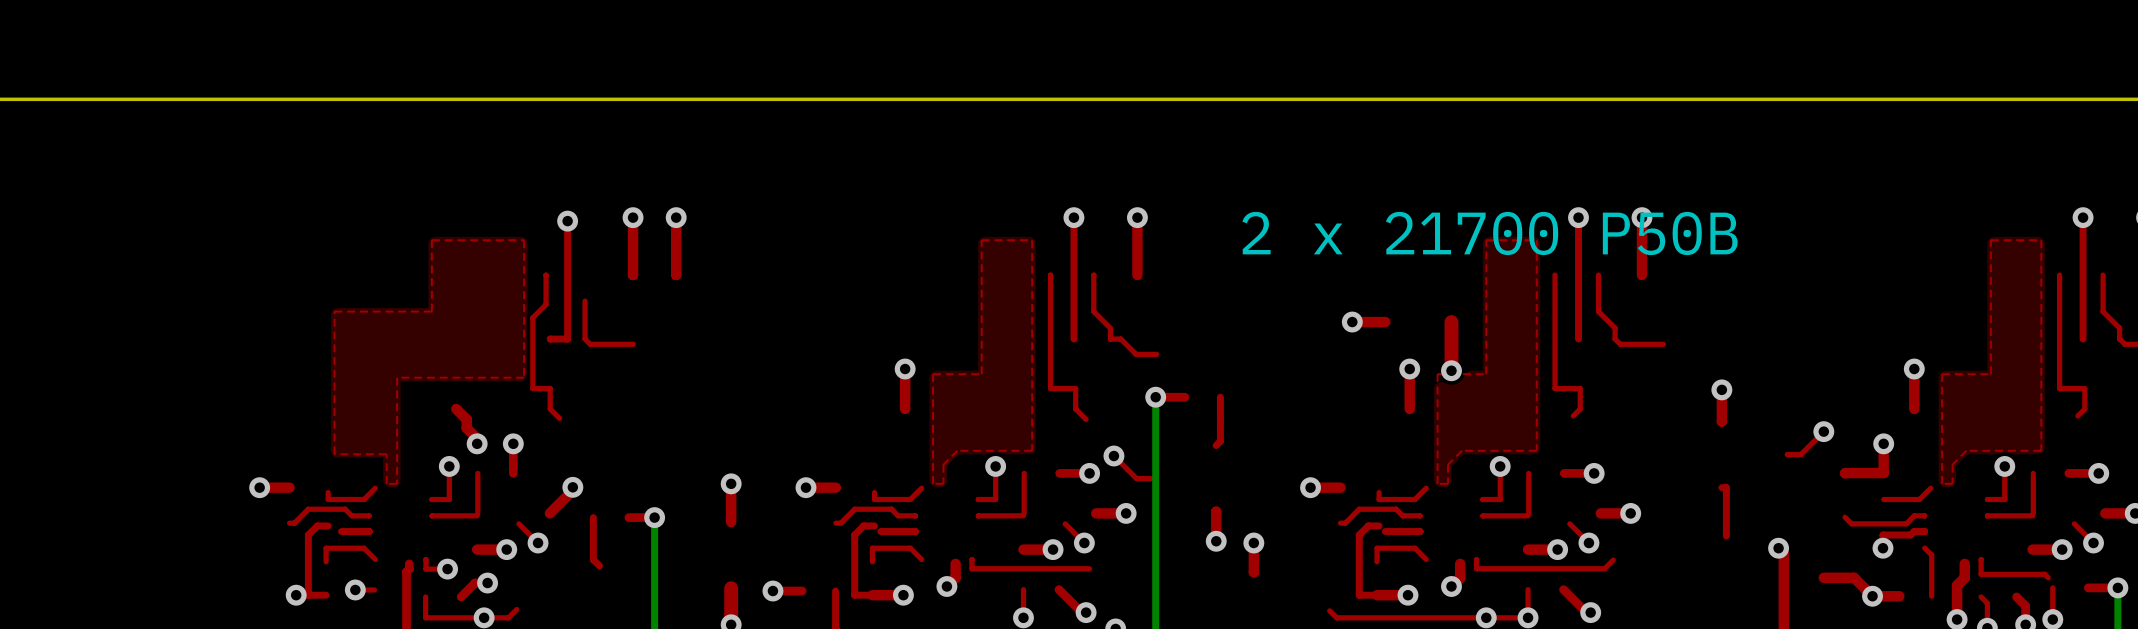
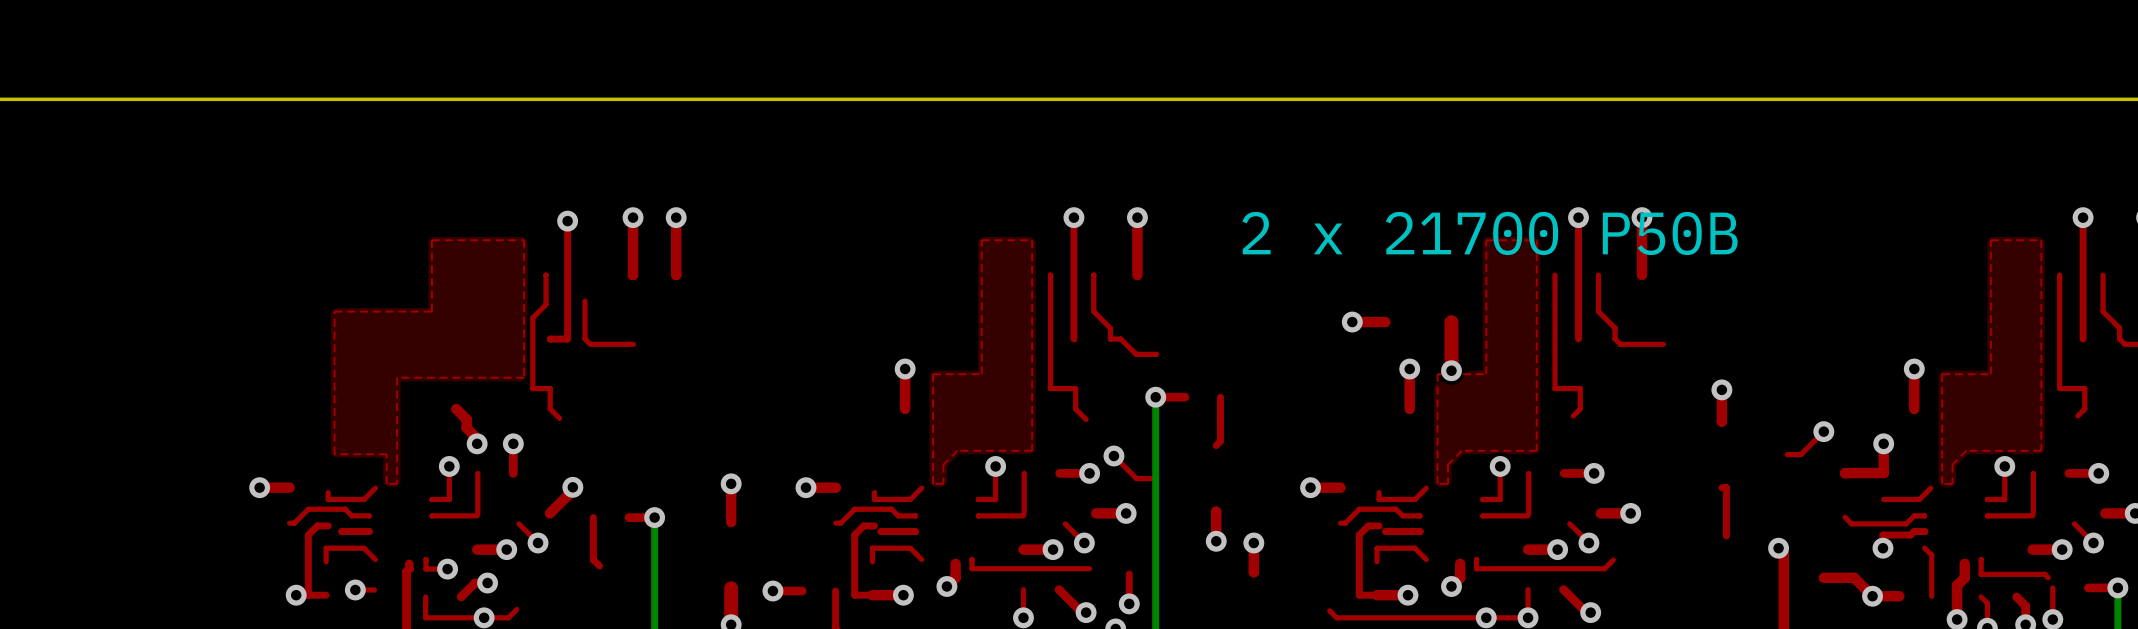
top track: none -> (1129, 573) (1129, 603)
via: none -> (1129, 603)

